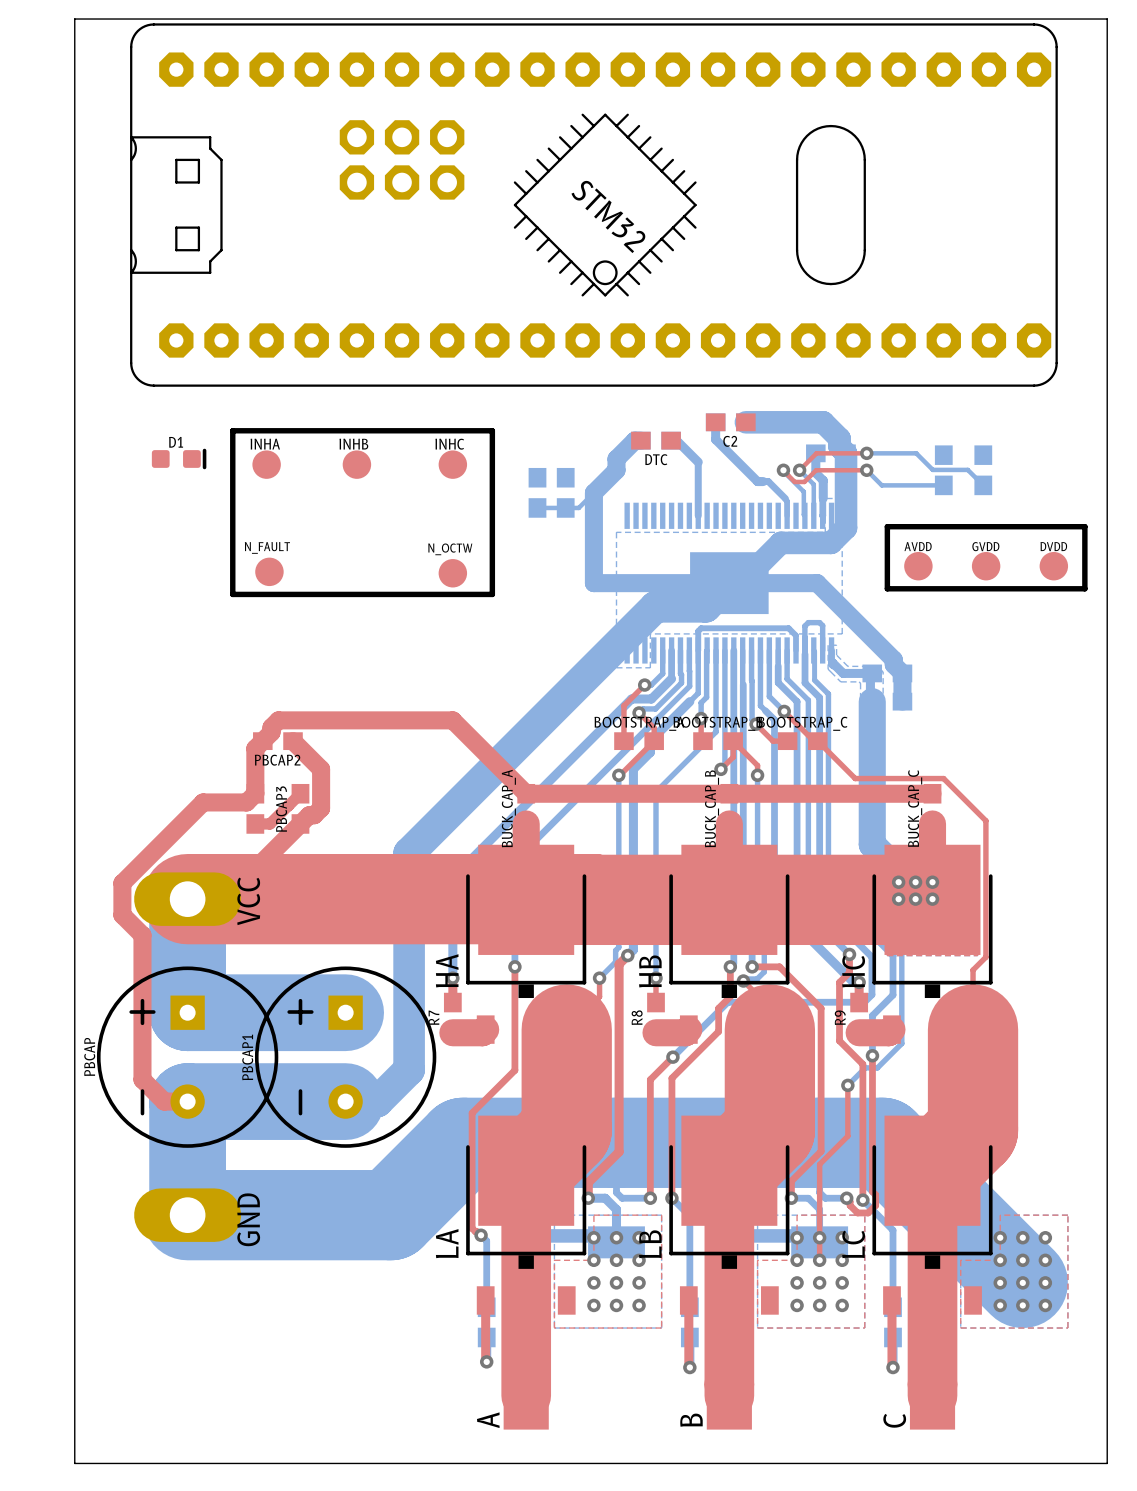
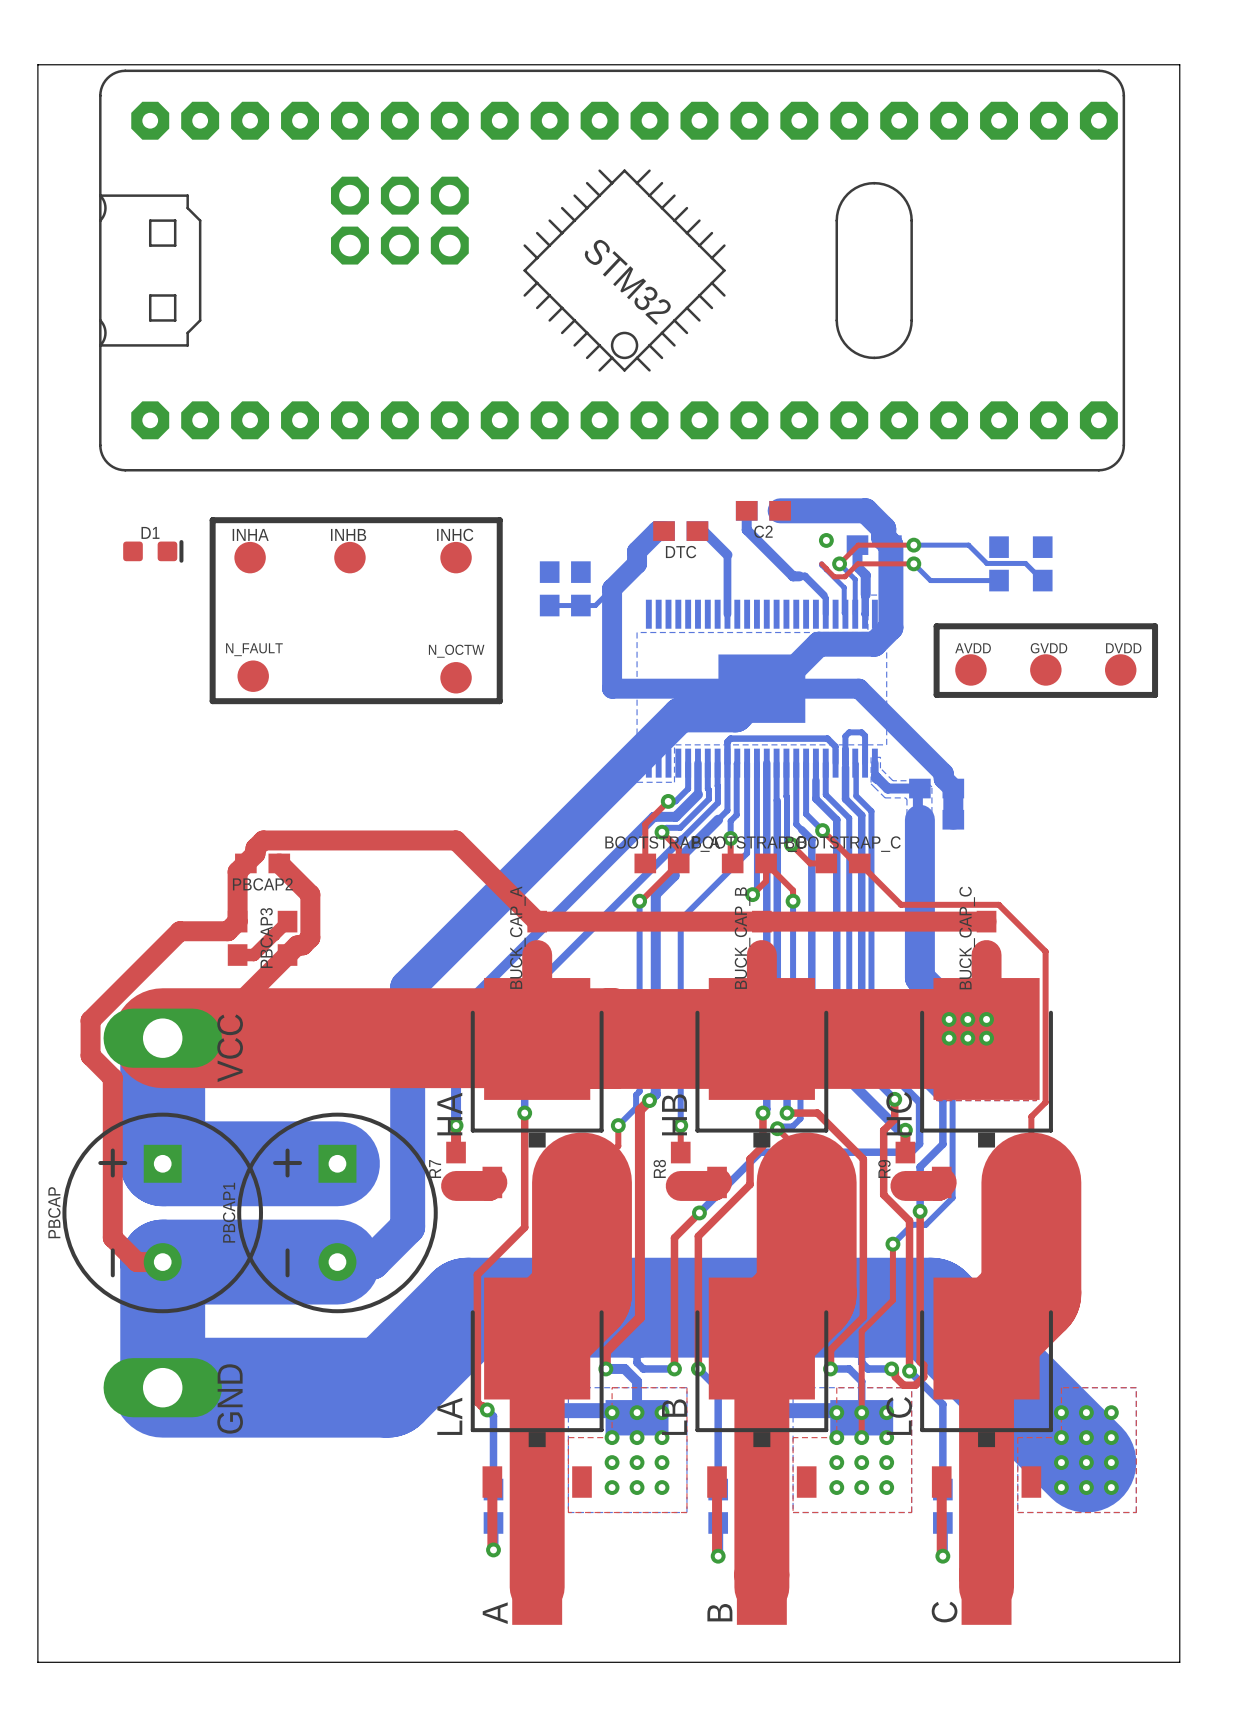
via position: (783, 470) -> (826, 540)

